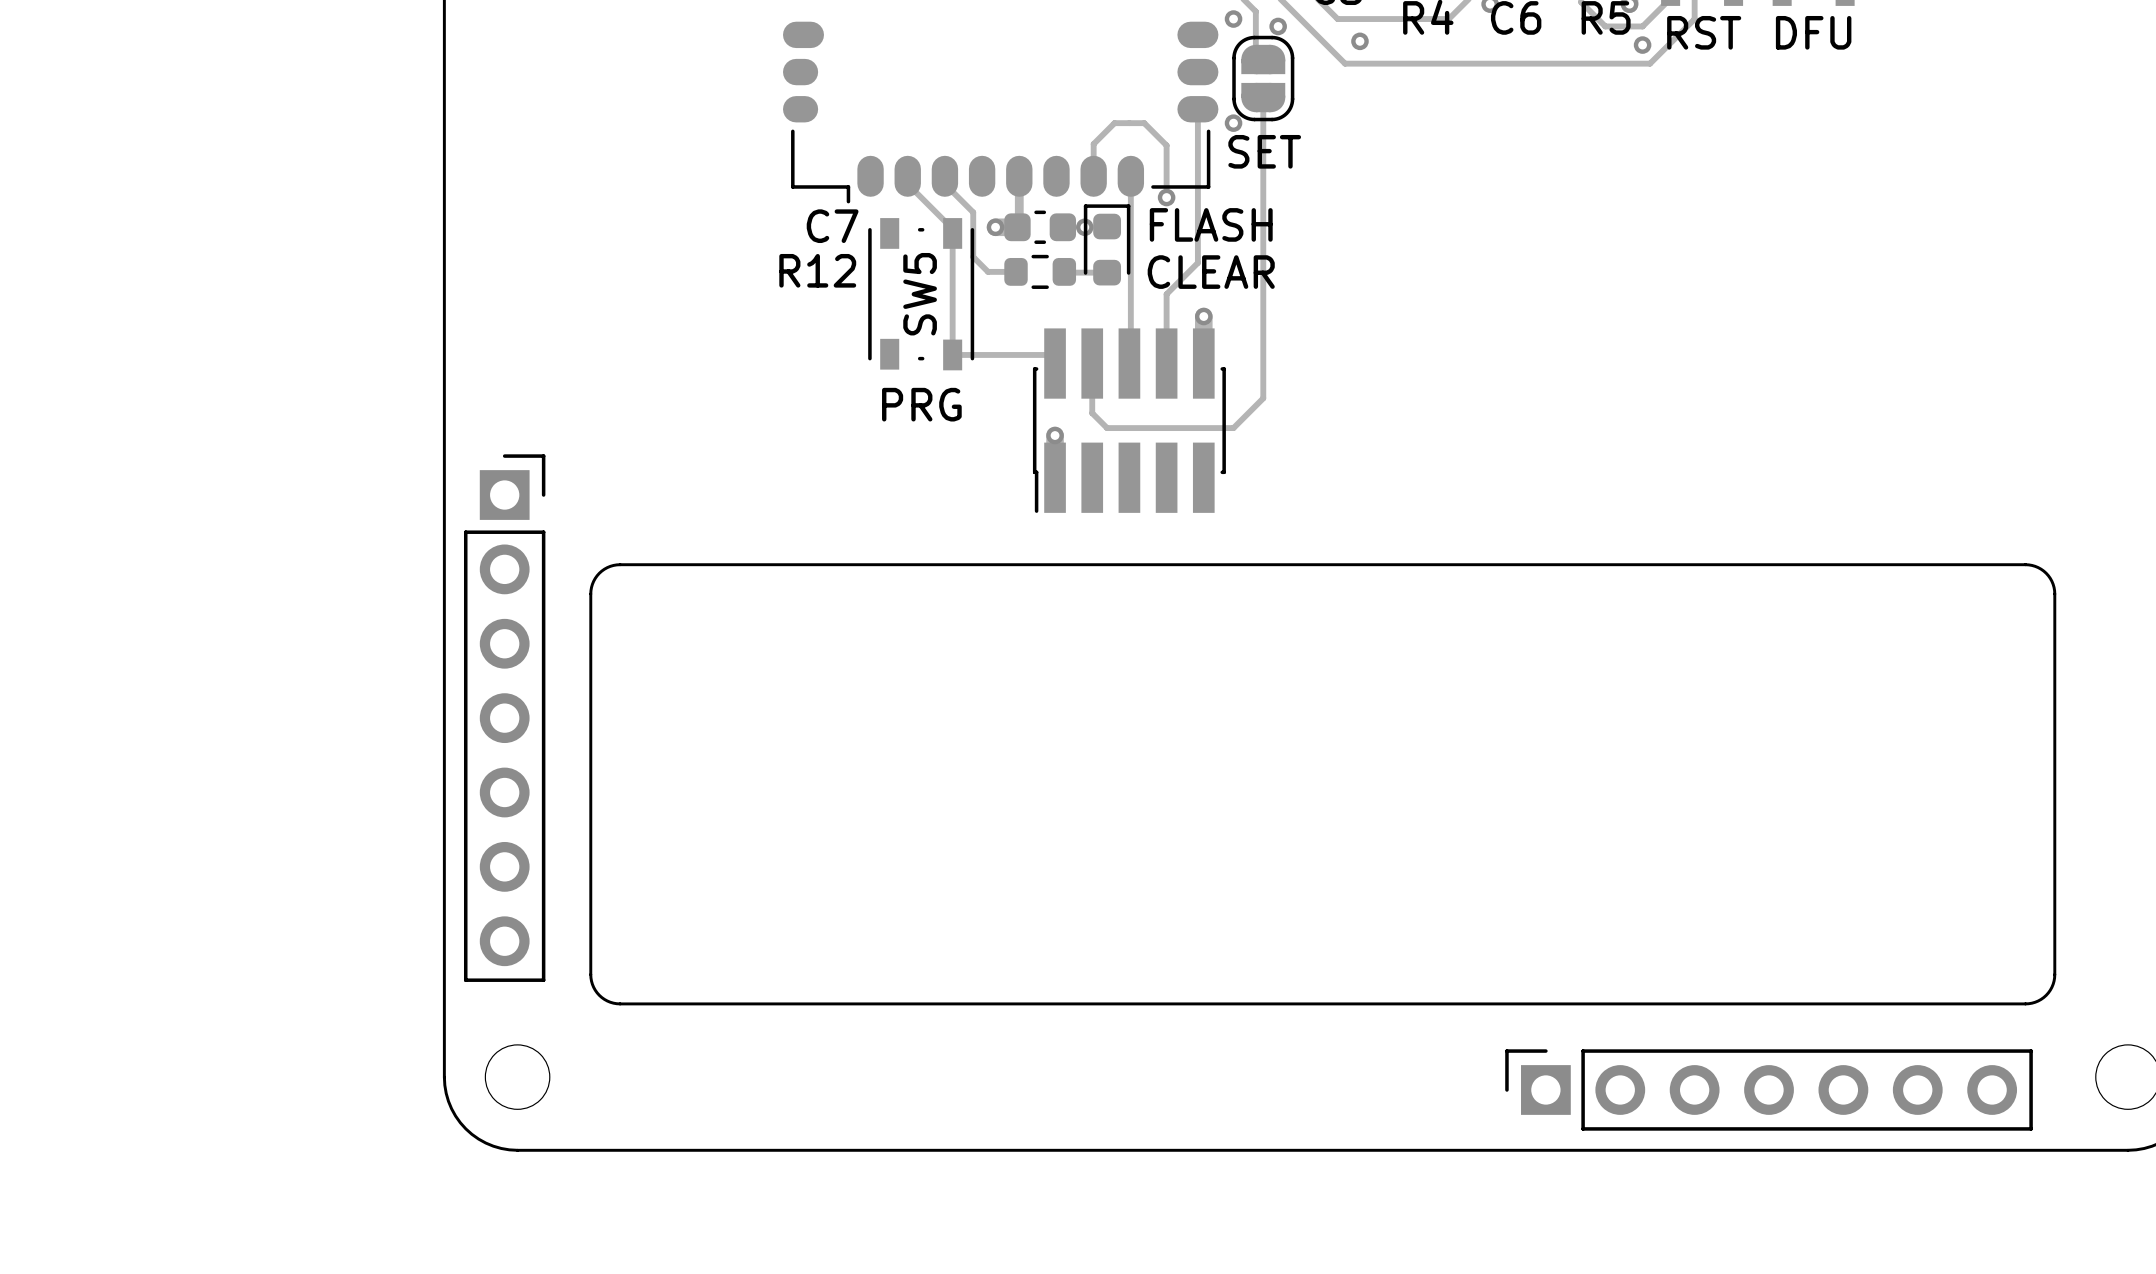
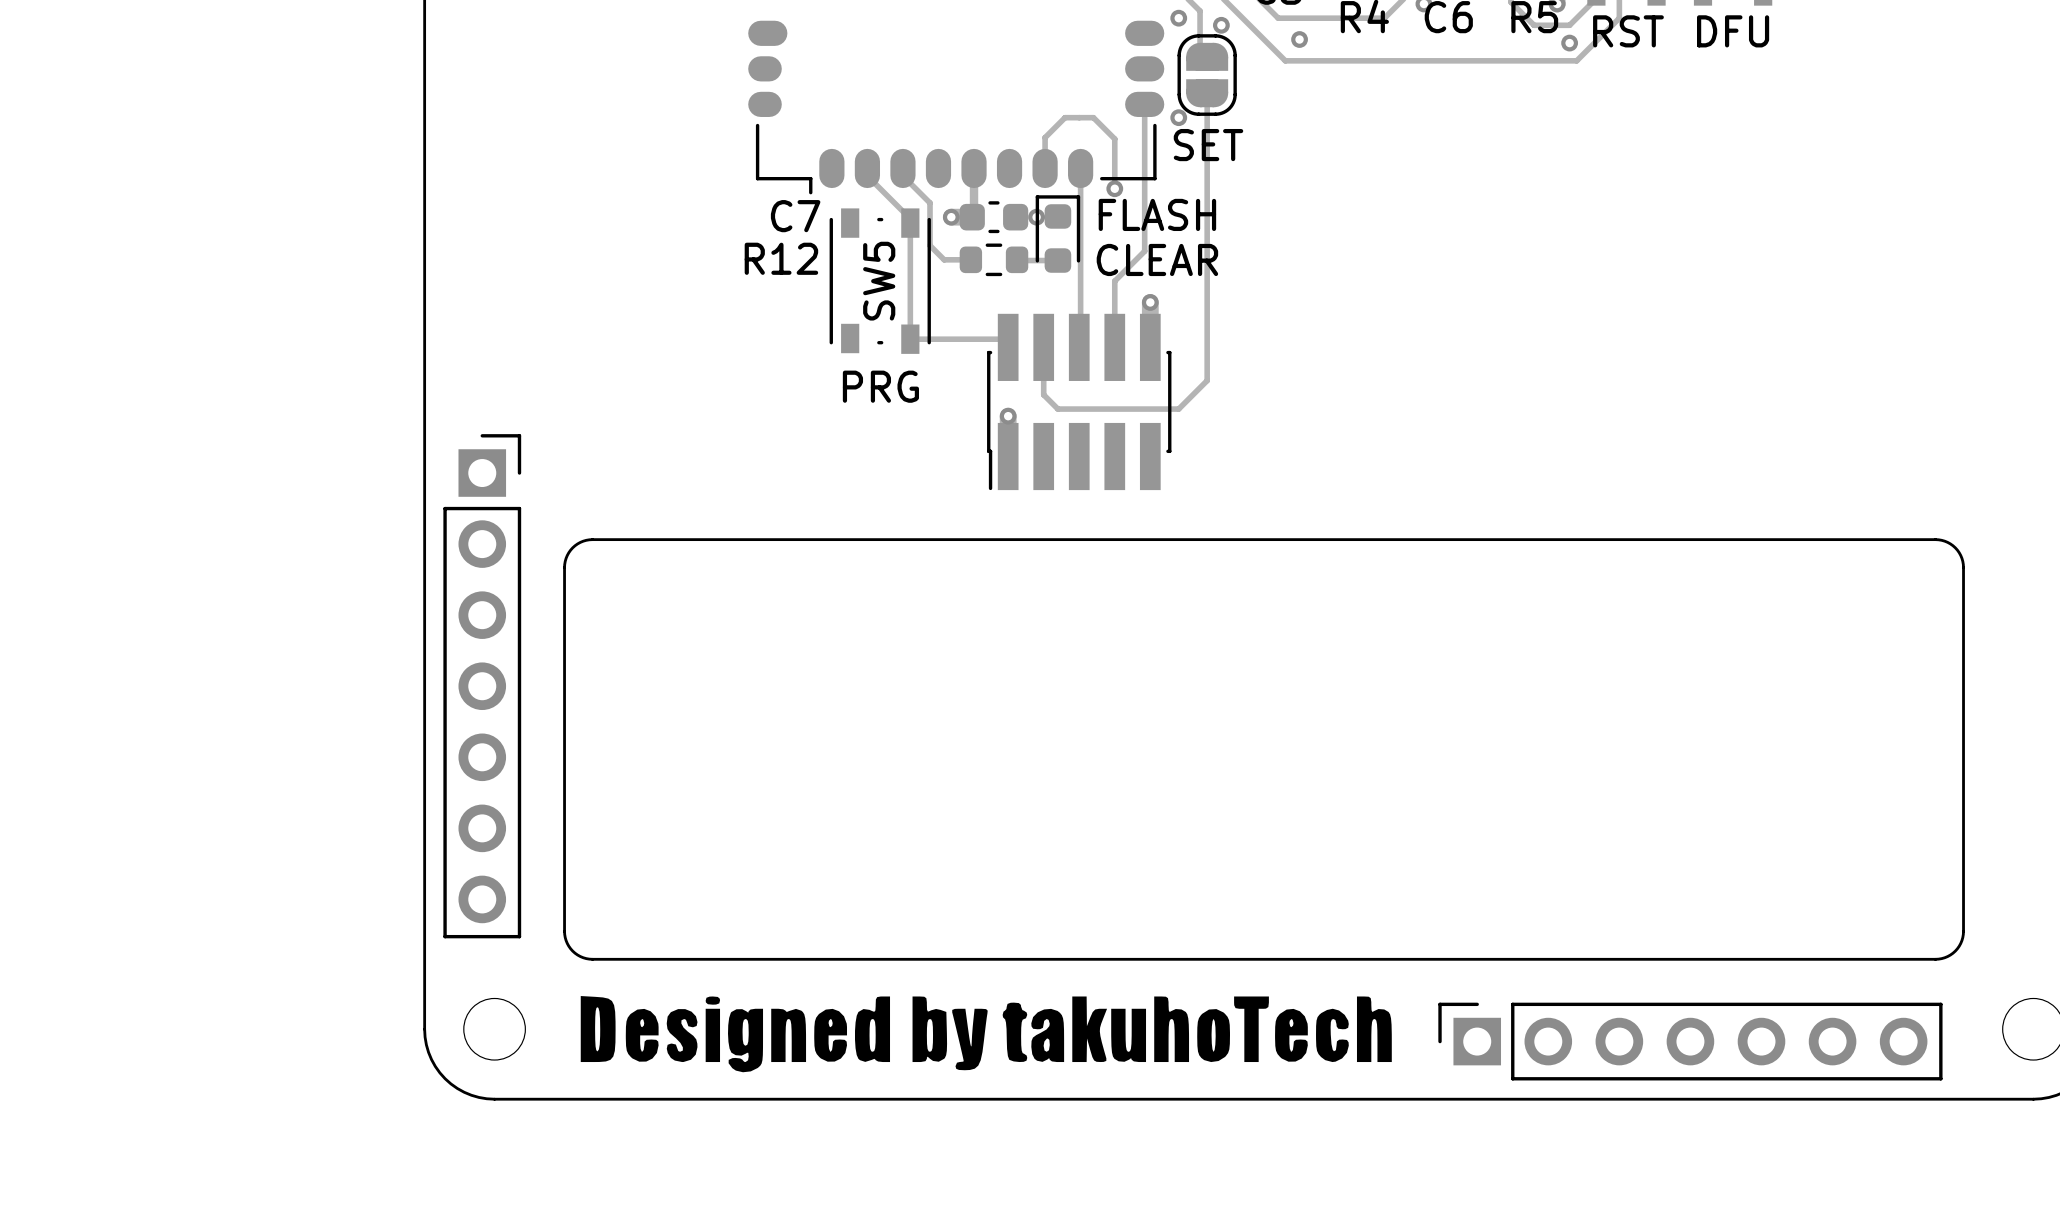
drawing: none -> [580, 996, 1392, 1073]

